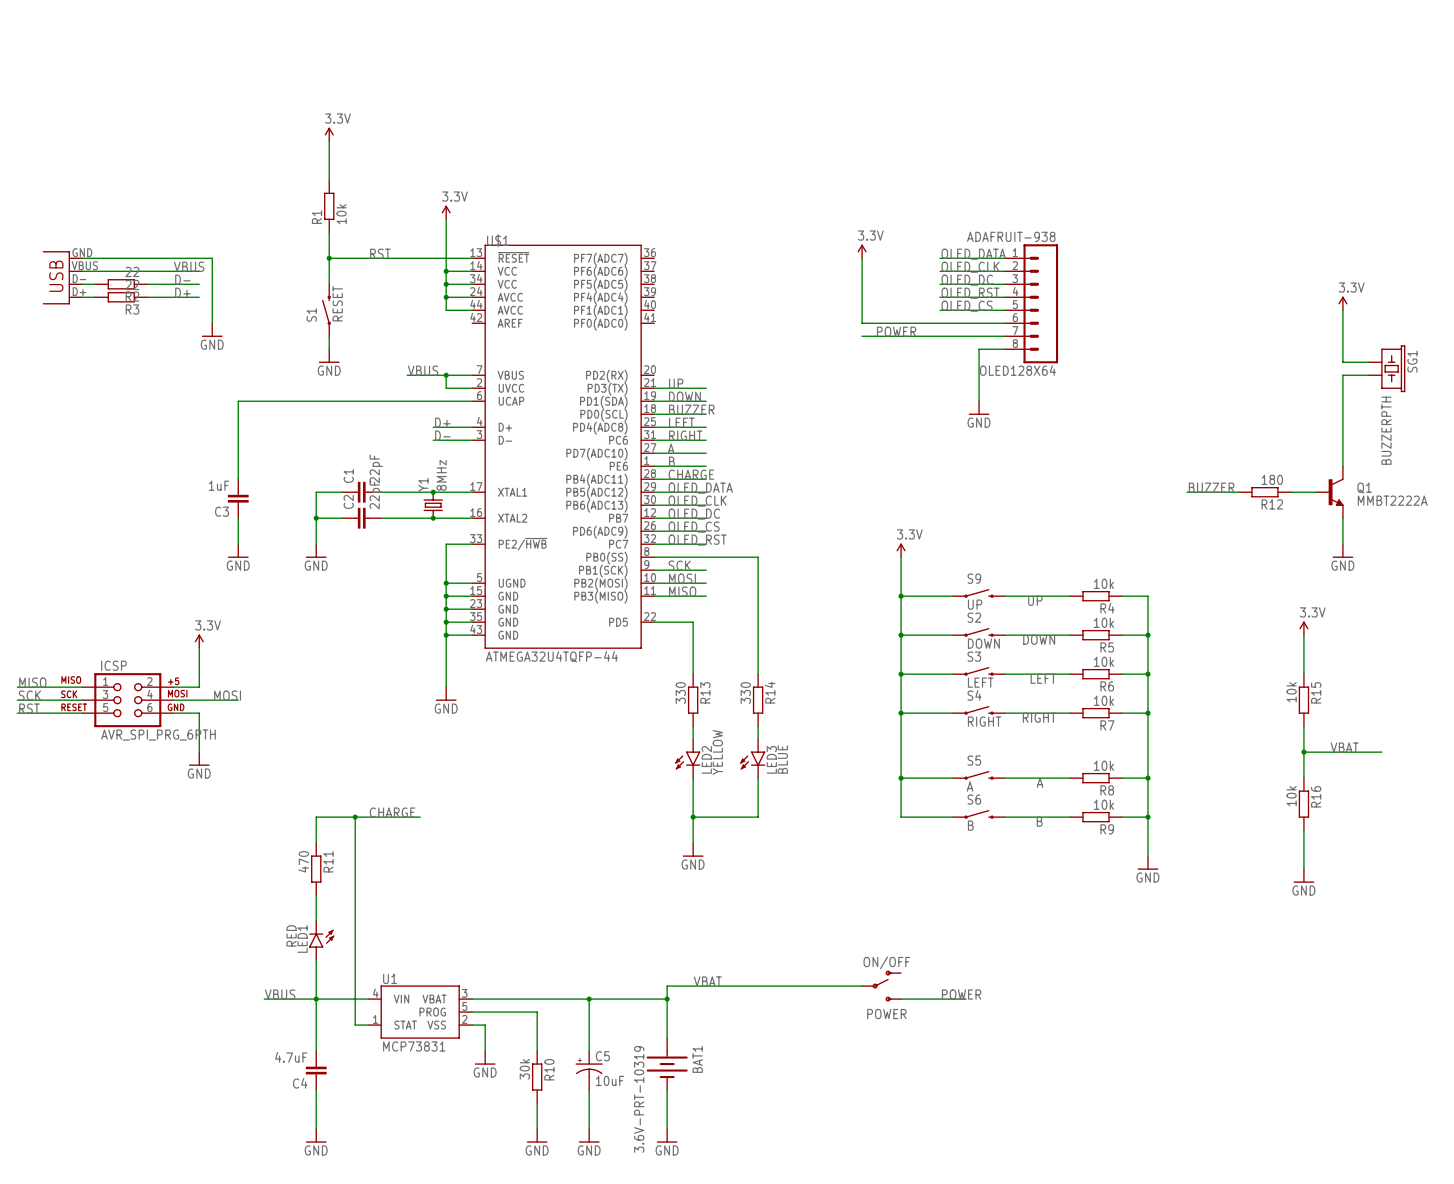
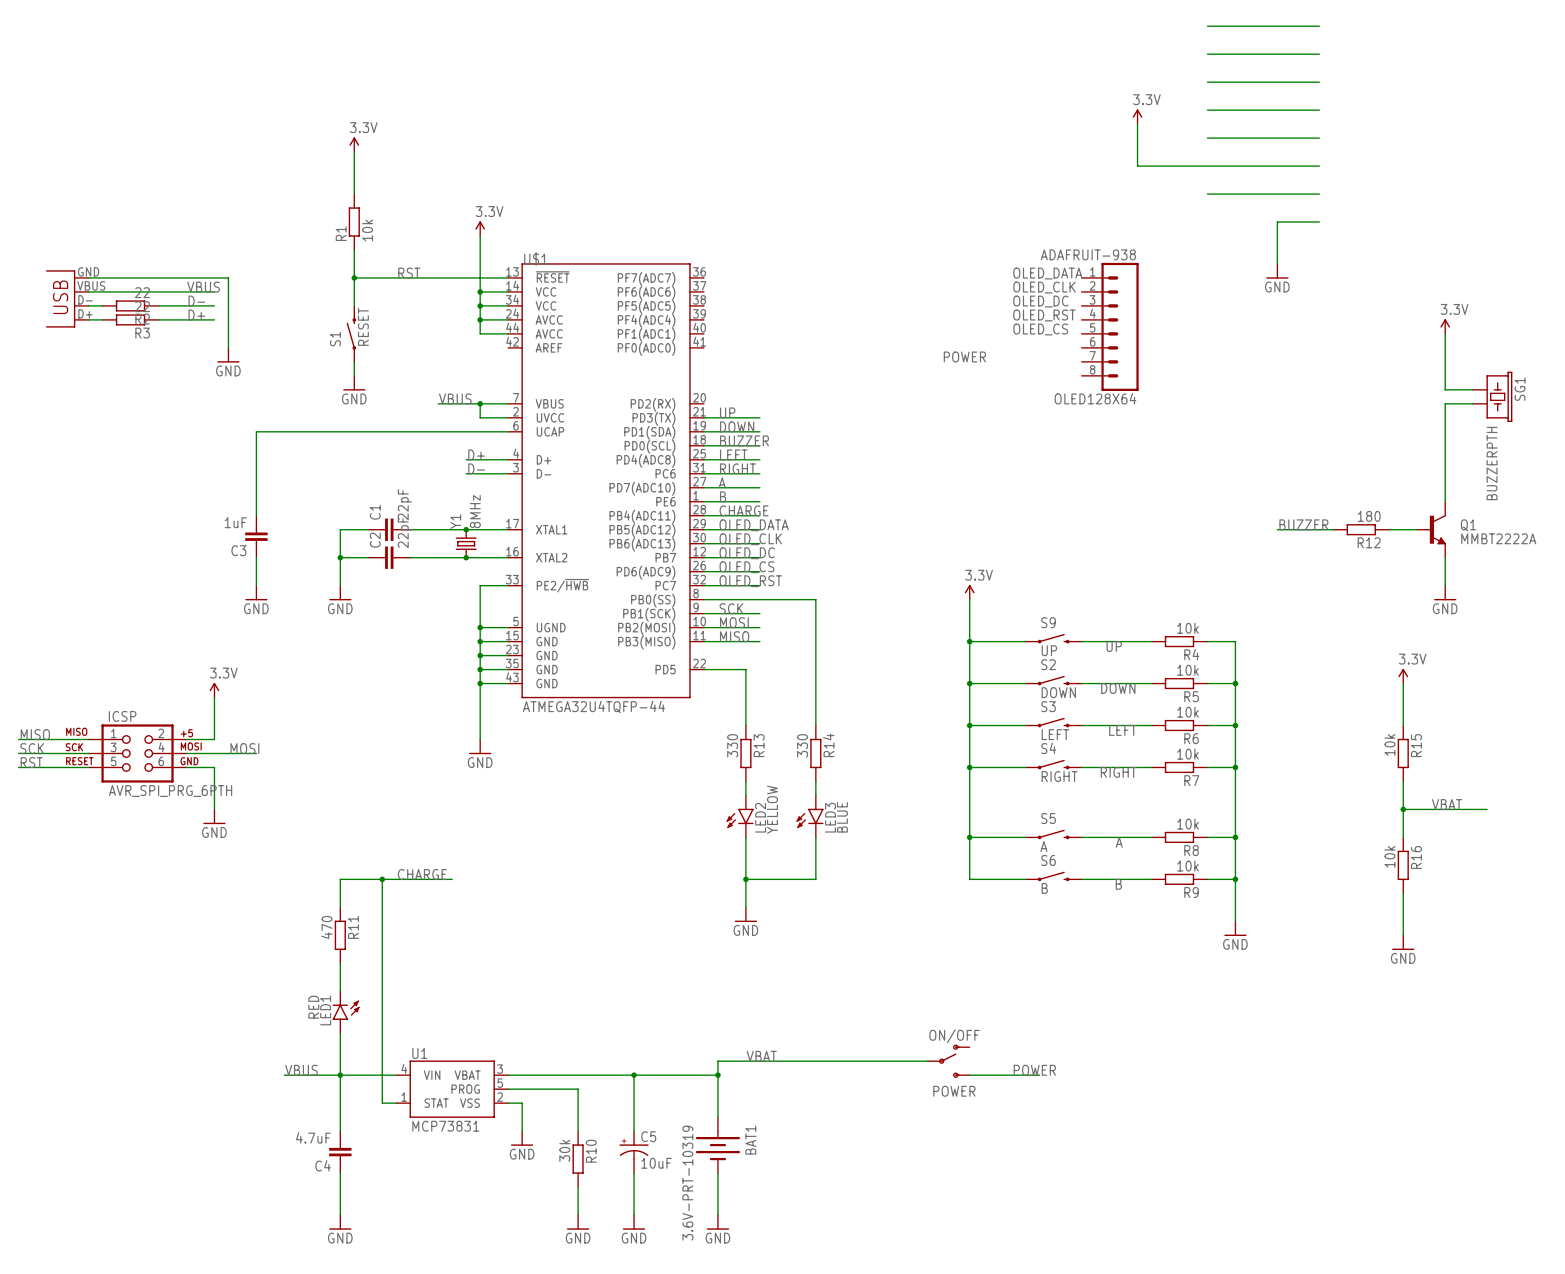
wire: none -> (1207, 26) (1319, 26)
wire: none -> (1207, 54) (1319, 54)
wire: none -> (1207, 82) (1319, 82)
wire: none -> (1207, 110) (1319, 110)
power symbol: none -> 3.3V (1137, 116)
wire: none -> (1137, 124) (1137, 166) (1319, 166)
wire: none -> (1207, 138) (1319, 138)
wire: none -> (1207, 194) (1319, 194)
wire: none -> (1319, 222) (1277, 222) (1277, 263)
power symbol: 3.3V (862, 251) -> none
power symbol: none -> GND (1277, 271)
wire: (862, 258) (862, 323) (1005, 323) -> none
wire: (940, 258) (1005, 258) -> none
wire: (940, 271) (1005, 271) -> none
wire: (940, 284) (1005, 284) -> none
wire: (940, 297) (1005, 297) -> none
wire: (940, 310) (1005, 310) -> none
wire: (862, 336) (1005, 336) -> none
wire: (1005, 349) (979, 349) (979, 401) -> none
power symbol: GND (979, 408) -> none

